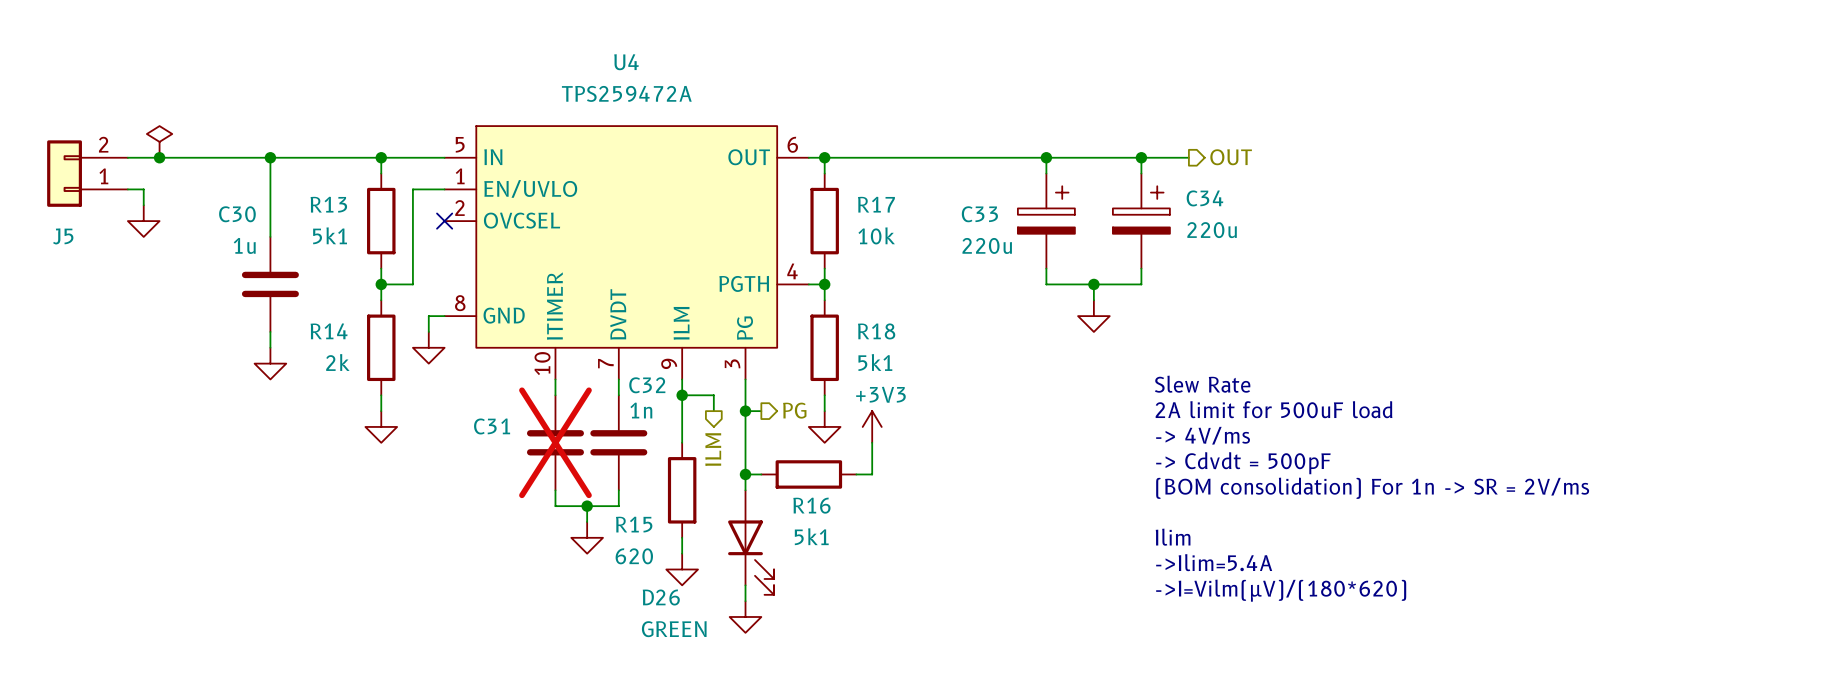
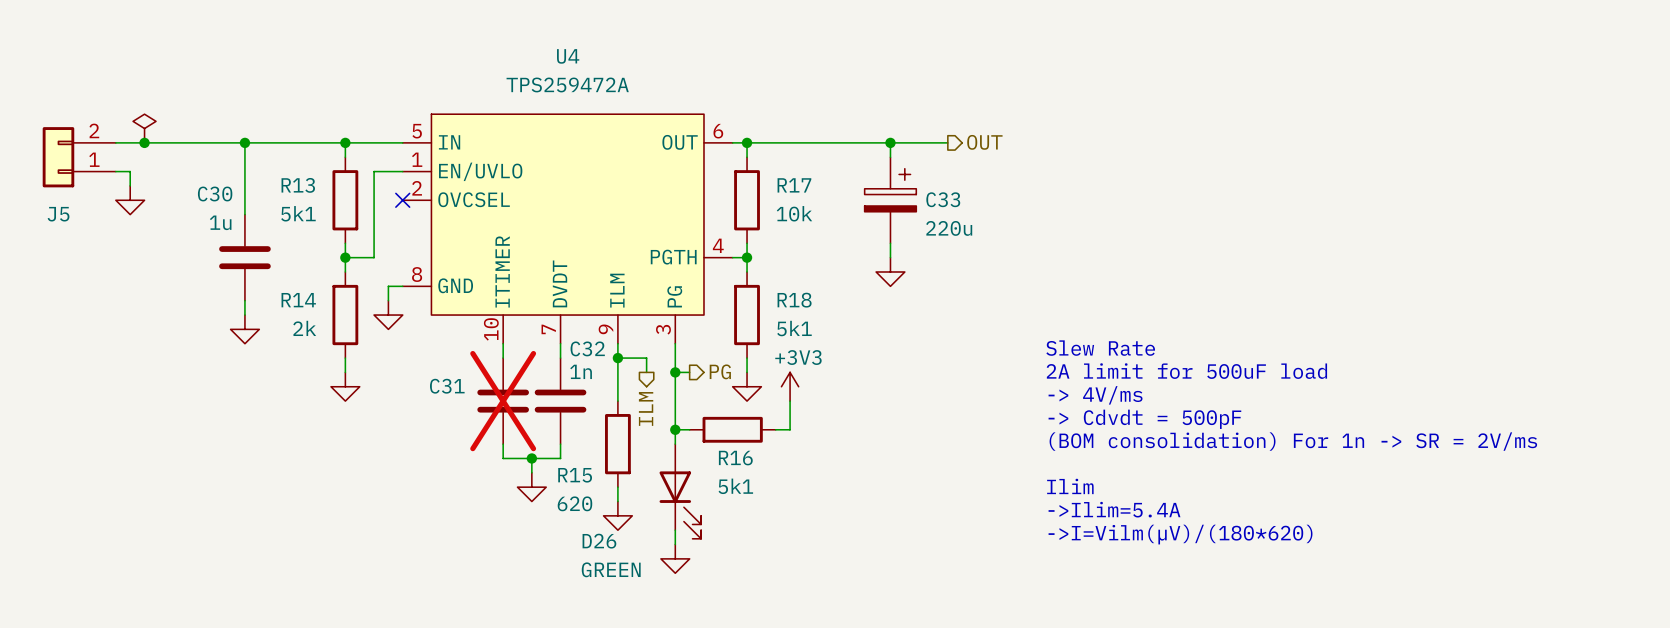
junction position: (1046, 157) -> (890, 142)
wire: (1141, 157) (1141, 173) -> (890, 142) (890, 157)
junction: (1141, 157) -> none
wire: (1188, 157) (1046, 157) (1046, 173) -> none
hierarchical label position: OUT (1231, 157) -> OUT (984, 142)
C33 name position: C33 (979, 214) -> C33 (943, 199)
C33 position: (1046, 221) -> (890, 200)
C34: 220u (1141, 221) -> none
C33 value position: 220u (987, 245) -> 220u (949, 228)
wire: (1046, 268) (1046, 284) (1141, 284) (1141, 268) -> none
wire: (1093, 284) (1093, 300) -> (890, 243) (890, 257)
junction: (1093, 284) -> none
power symbol position: (1093, 316) -> (890, 271)

